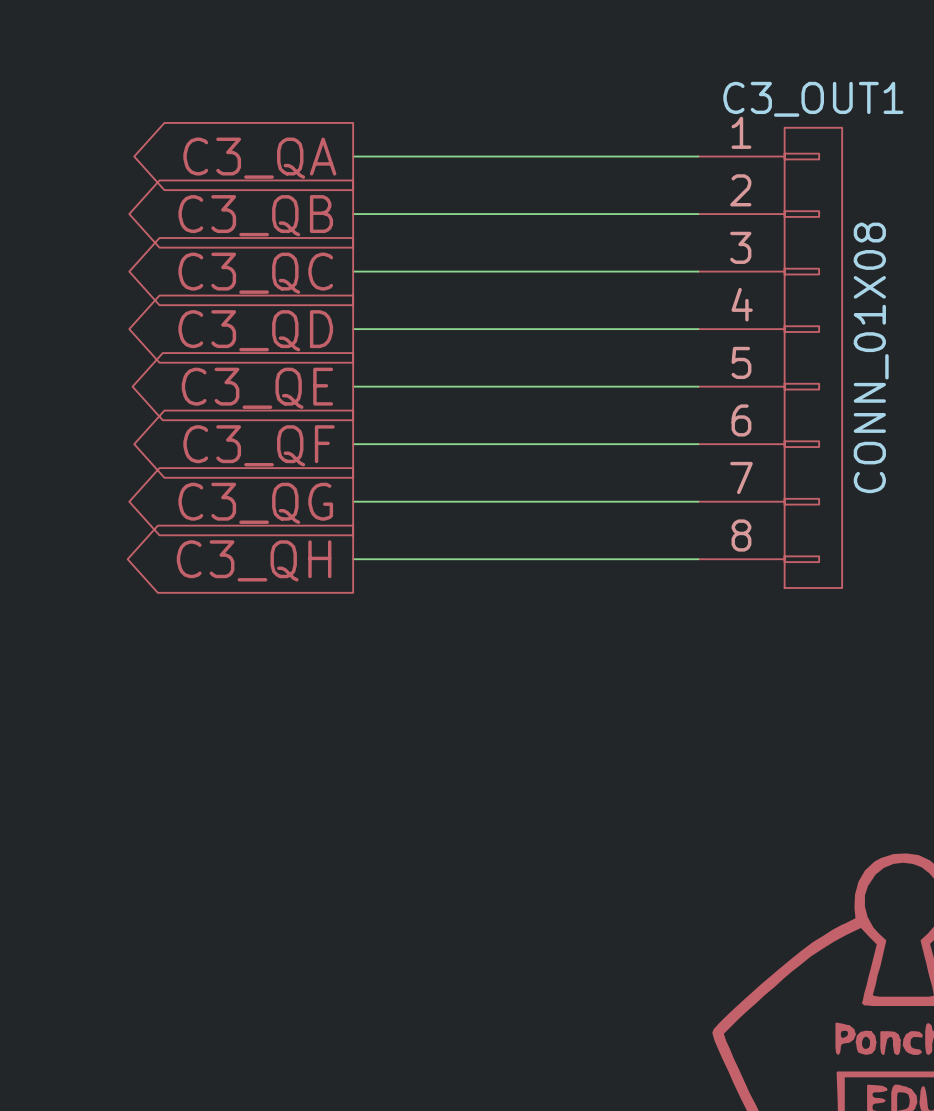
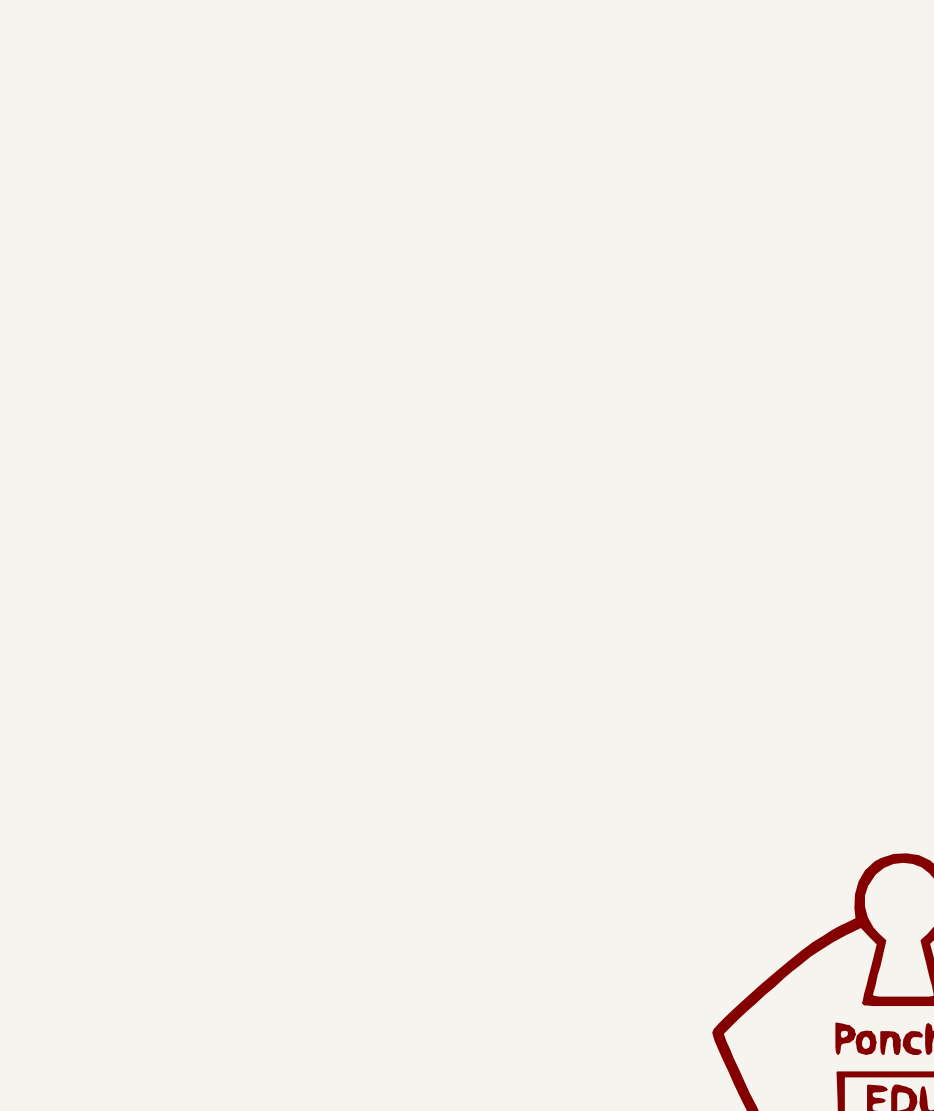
wire: (353, 156) (698, 156) -> none
global label: C3_QA (259, 158) -> none
wire: (353, 214) (698, 214) -> none
global label: C3_QB (255, 215) -> none
wire: (353, 271) (698, 271) -> none
global label: C3_QC (255, 273) -> none
wire: (353, 329) (698, 329) -> none
global label: C3_QD (255, 330) -> none
C3_OUT1: CONN_01X08 (770, 357) -> none
wire: (353, 386) (698, 386) -> none
global label: C3_QE (257, 388) -> none
wire: (353, 444) (698, 444) -> none
global label: C3_QF (259, 445) -> none
wire: (353, 501) (698, 501) -> none
global label: C3_QG (255, 503) -> none
wire: (353, 559) (698, 559) -> none
global label: C3_QH (254, 560) -> none

